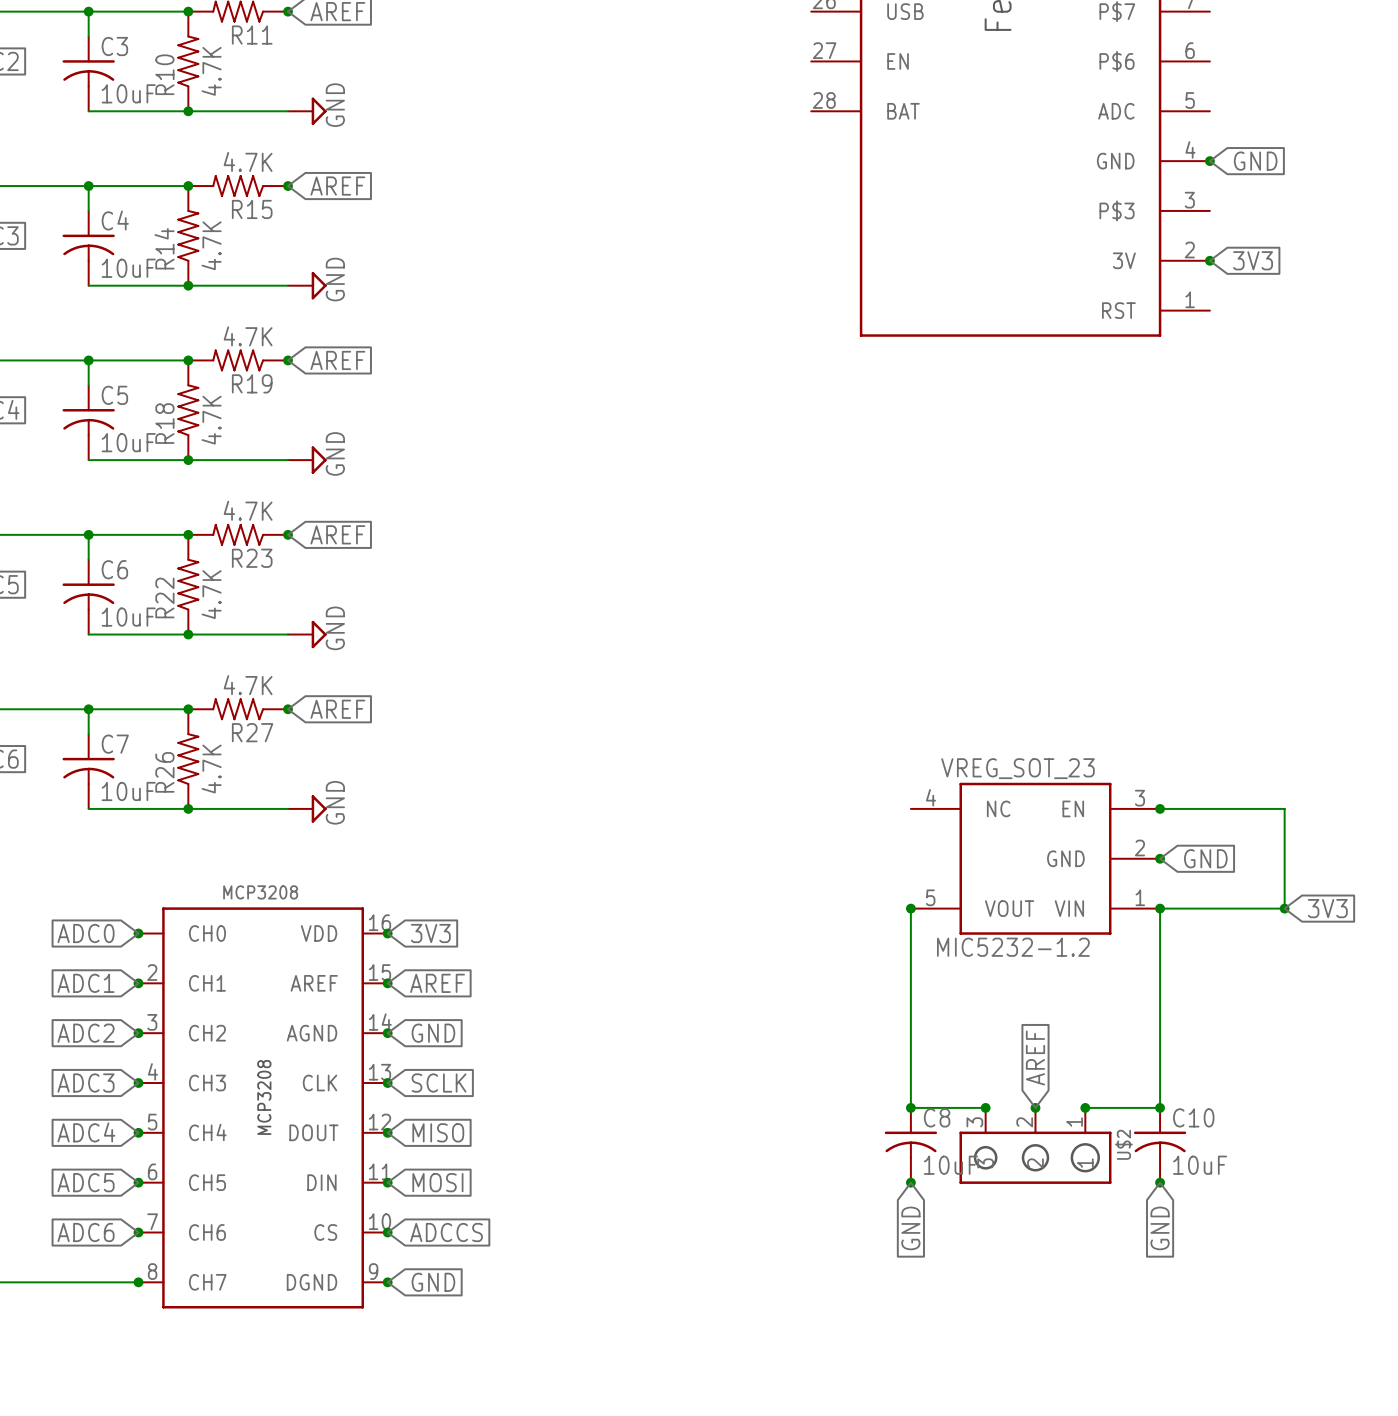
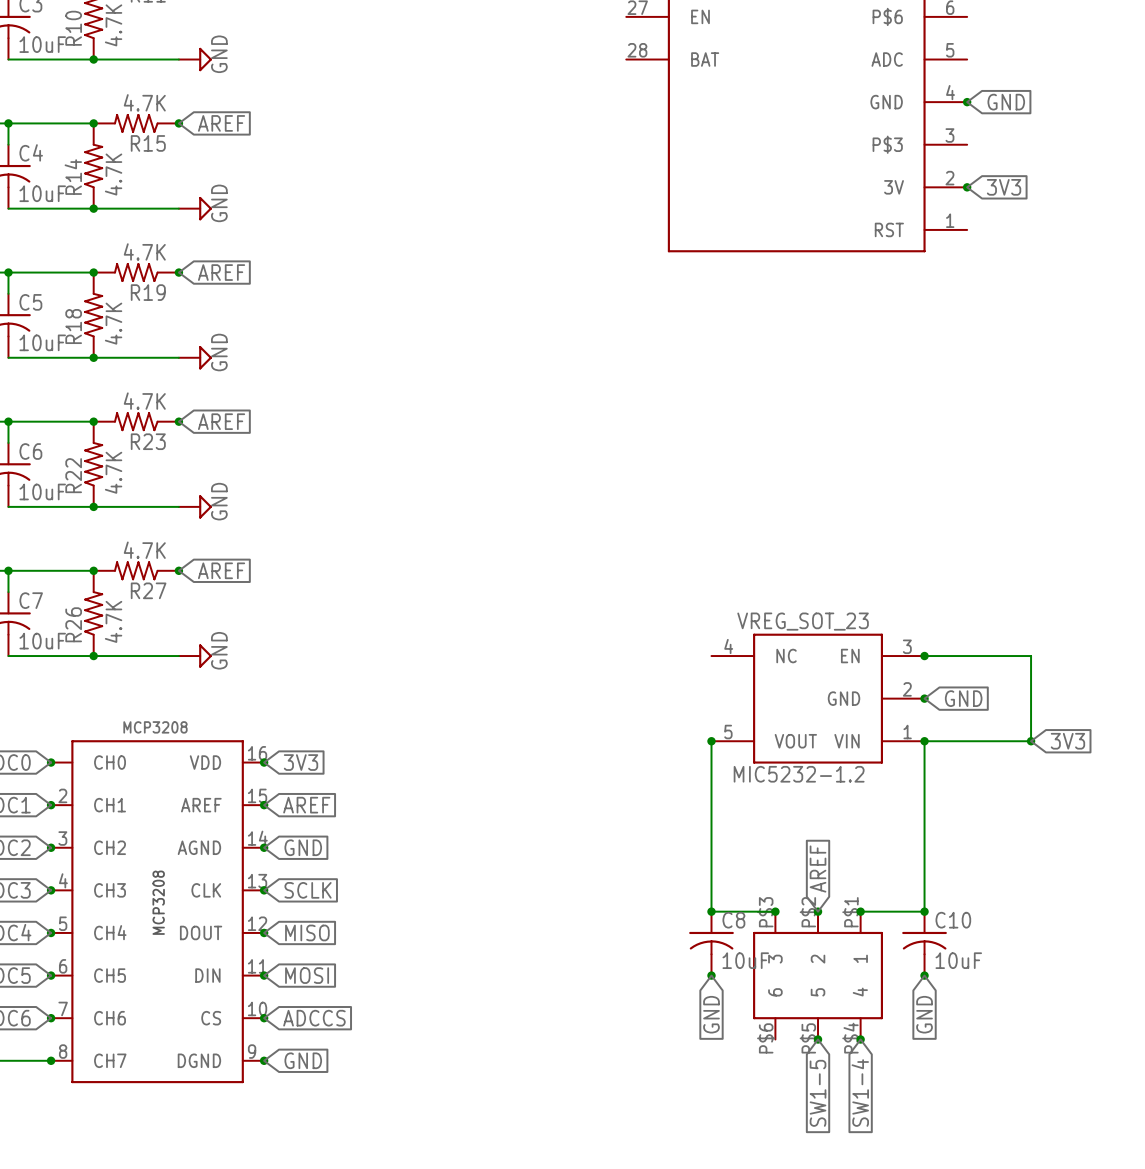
U$2: (1035, 1145) -> none
part: none -> (818, 975)
junction: none -> (818, 1039)
junction: none -> (860, 1039)
global label: none -> SW1-5 (818, 1093)
global label: none -> SW1-4 (860, 1093)

